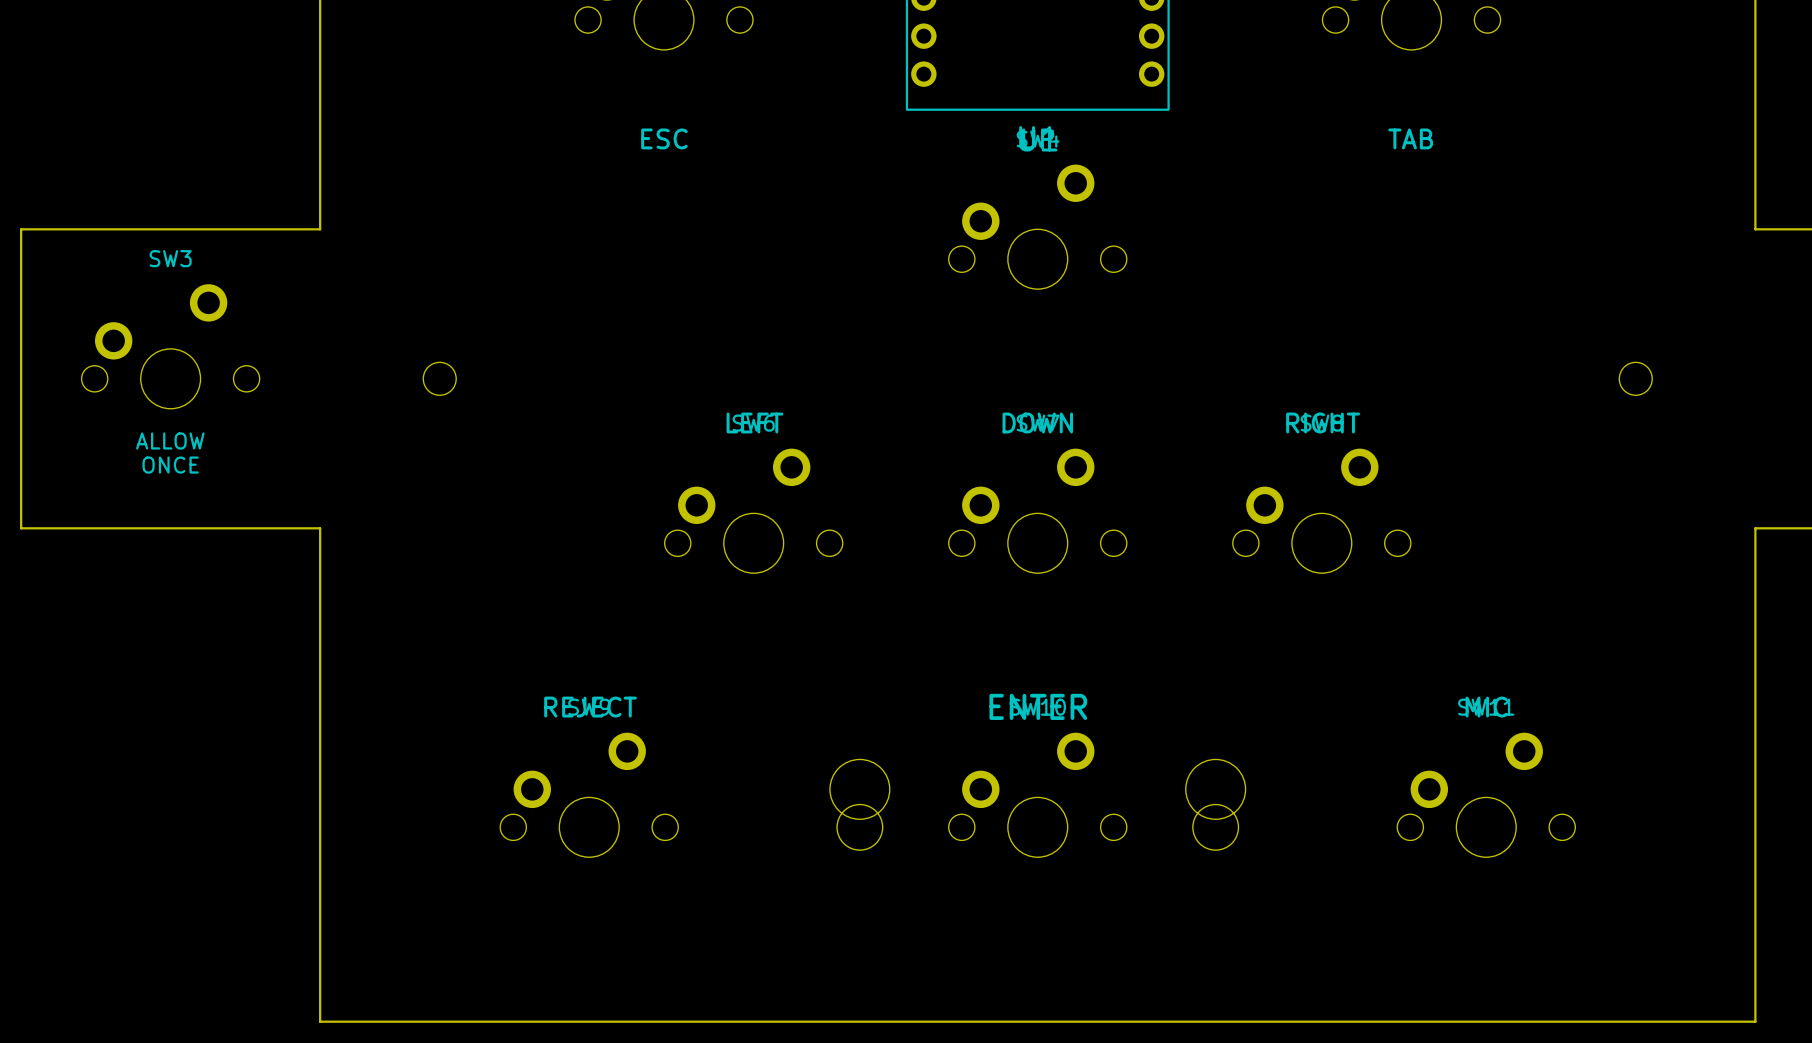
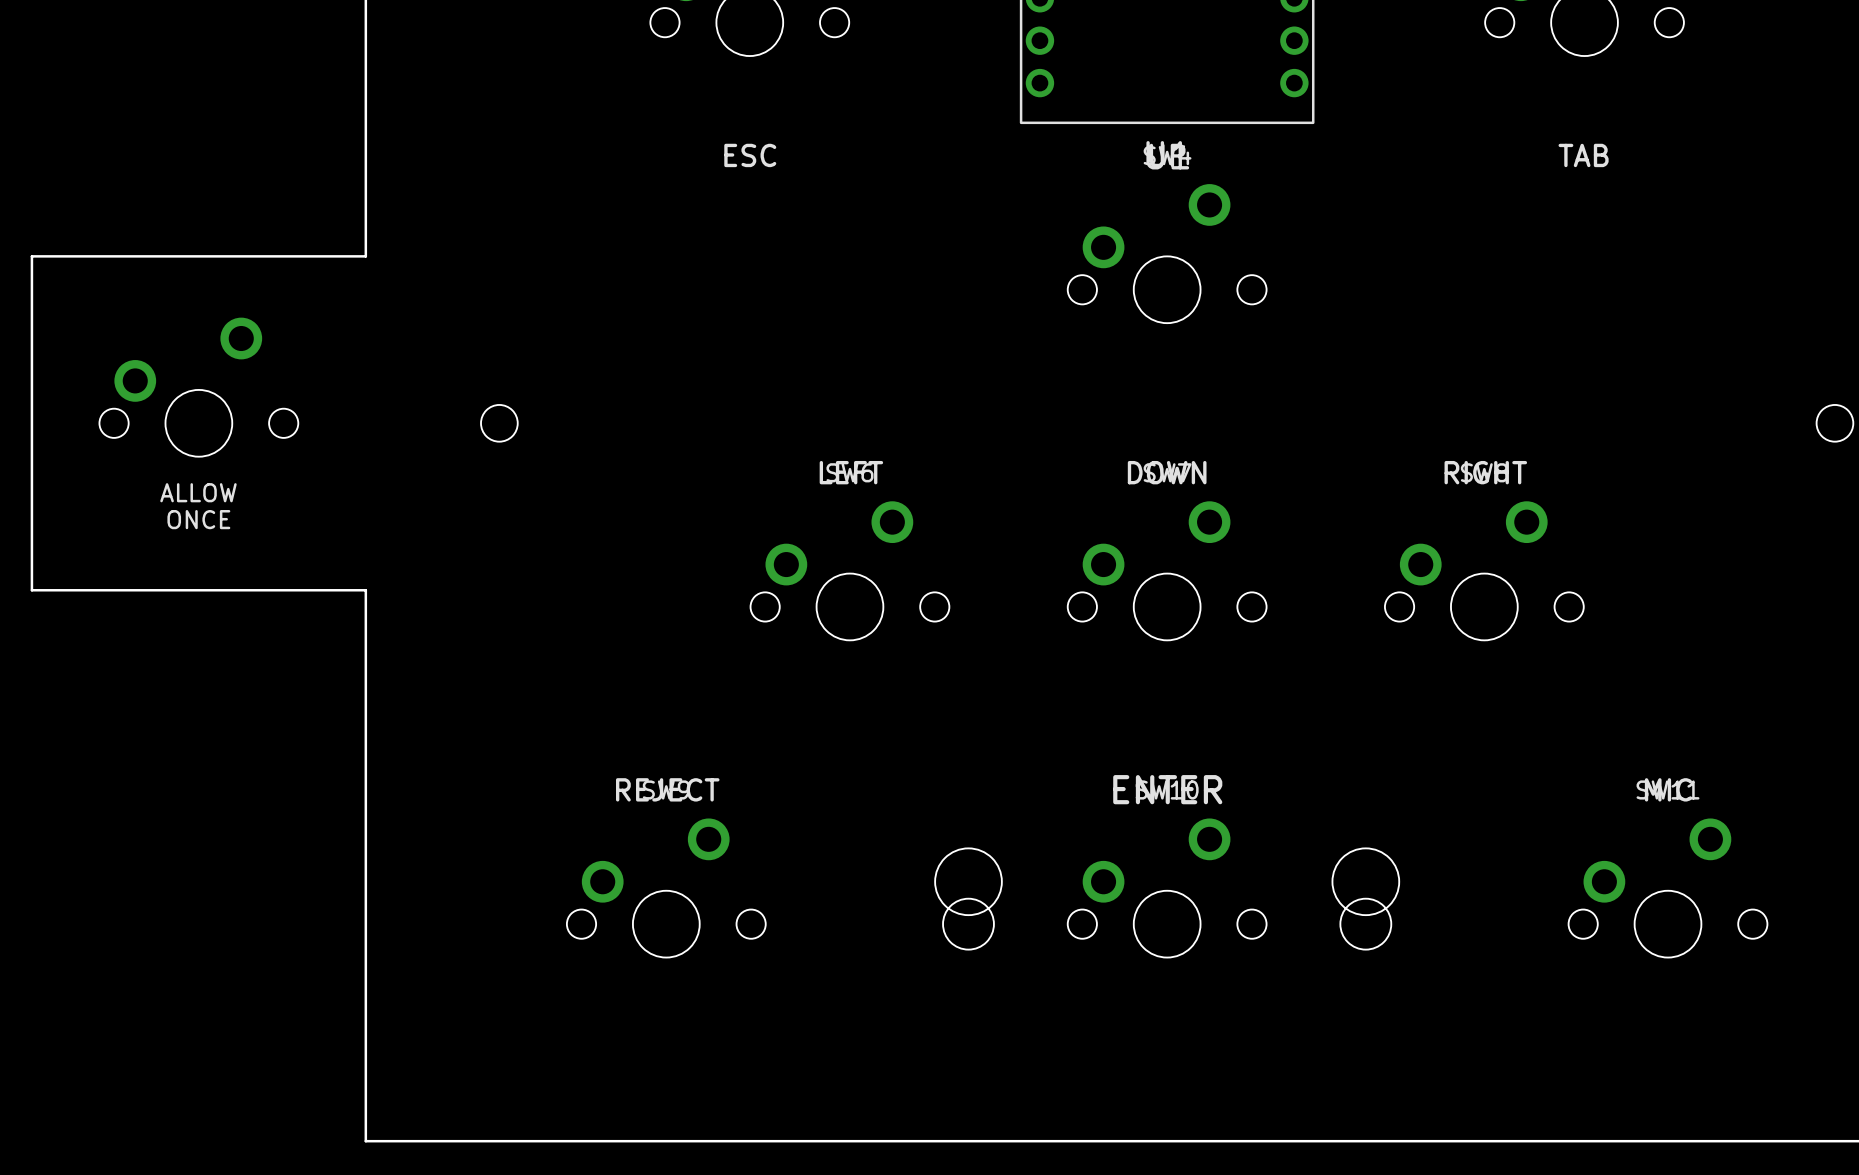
SW3 name: SW3 (170, 258) -> none

